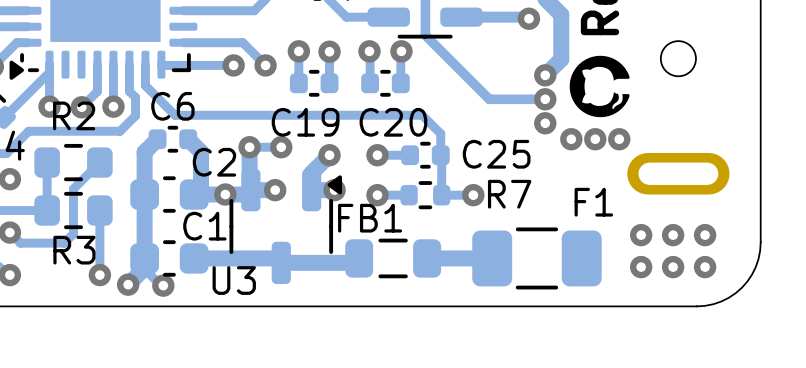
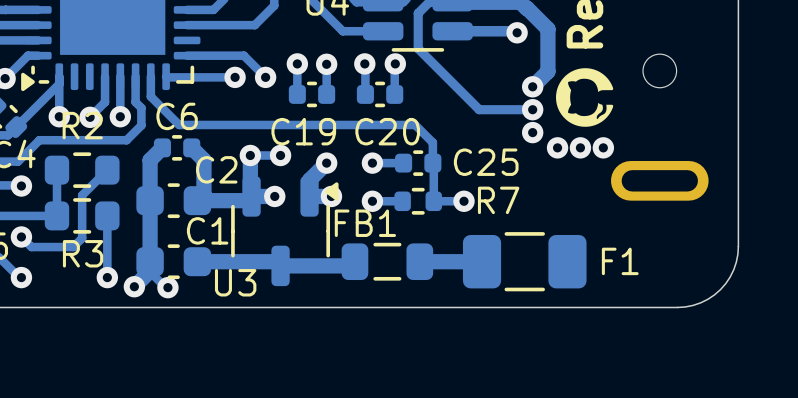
via: (225, 194) -> none
F1 name position: F1 (593, 202) -> F1 (620, 261)
via: (641, 235) -> none
via: (673, 235) -> none
via: (705, 235) -> none
via: (641, 267) -> none
via: (673, 267) -> none
via: (705, 267) -> none

